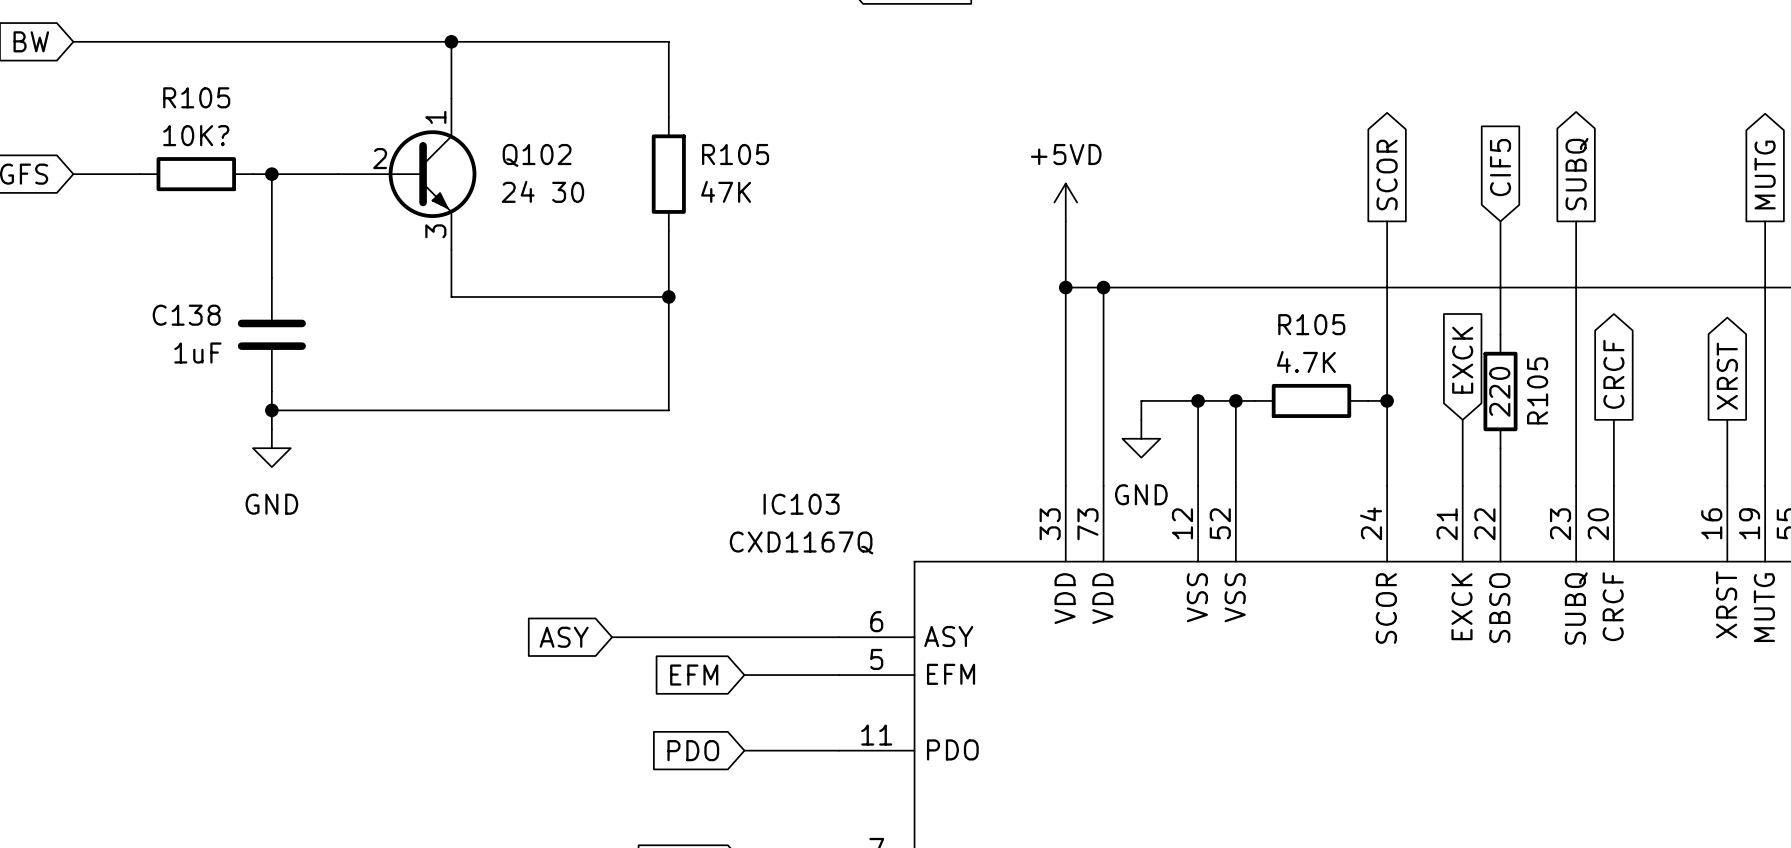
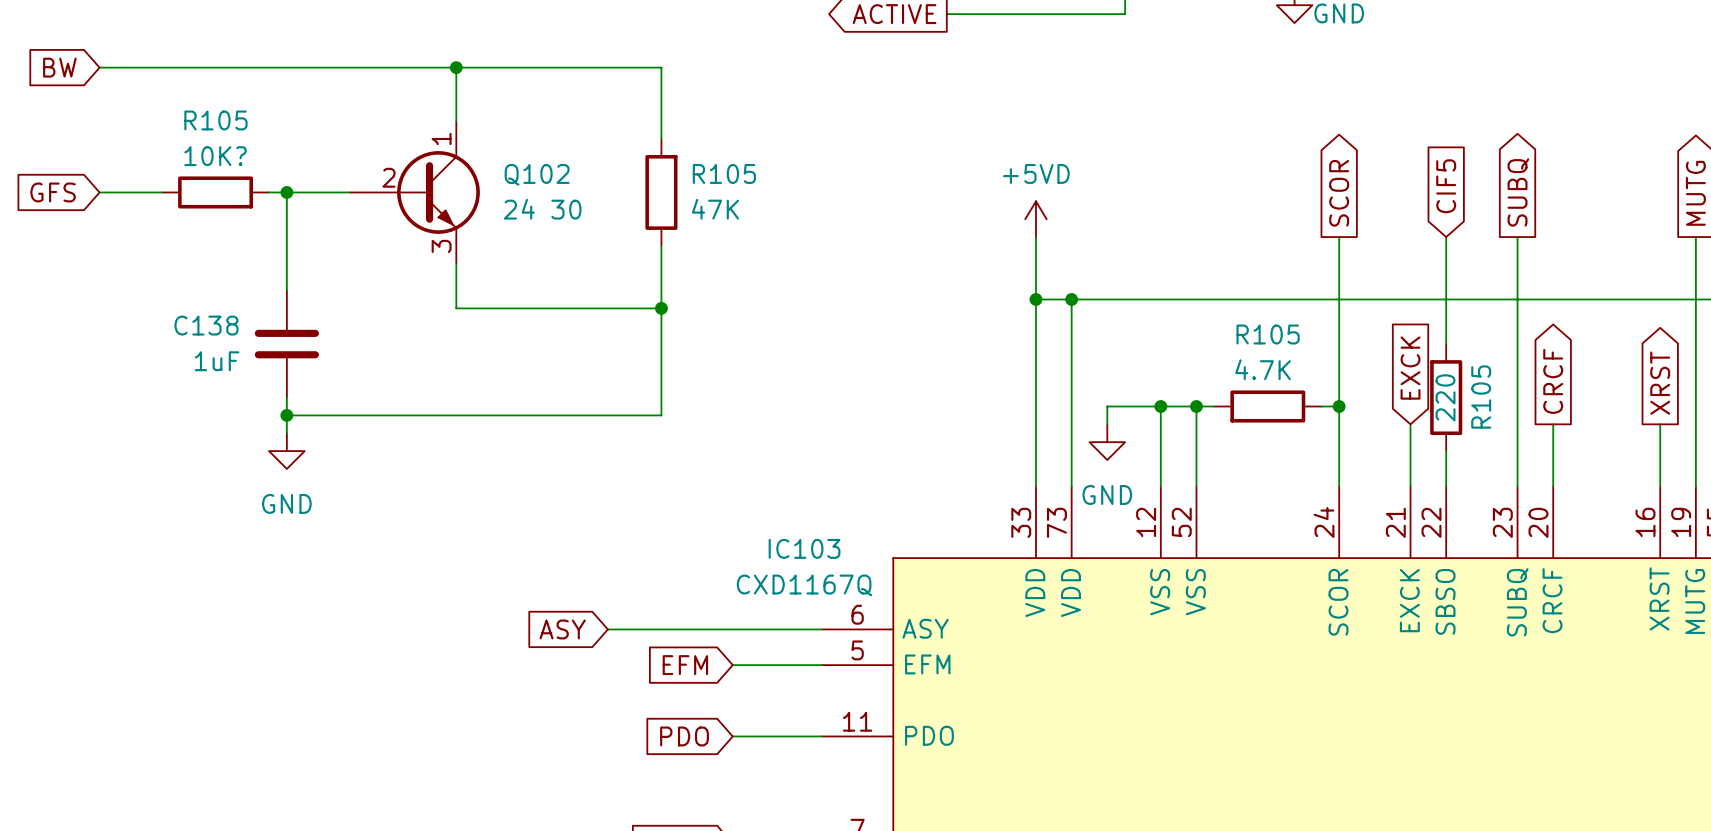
IC103 name position: IC103 (801, 504) -> IC103 (804, 548)
IC103 value position: CXD1167Q (801, 542) -> CXD1167Q (804, 585)

